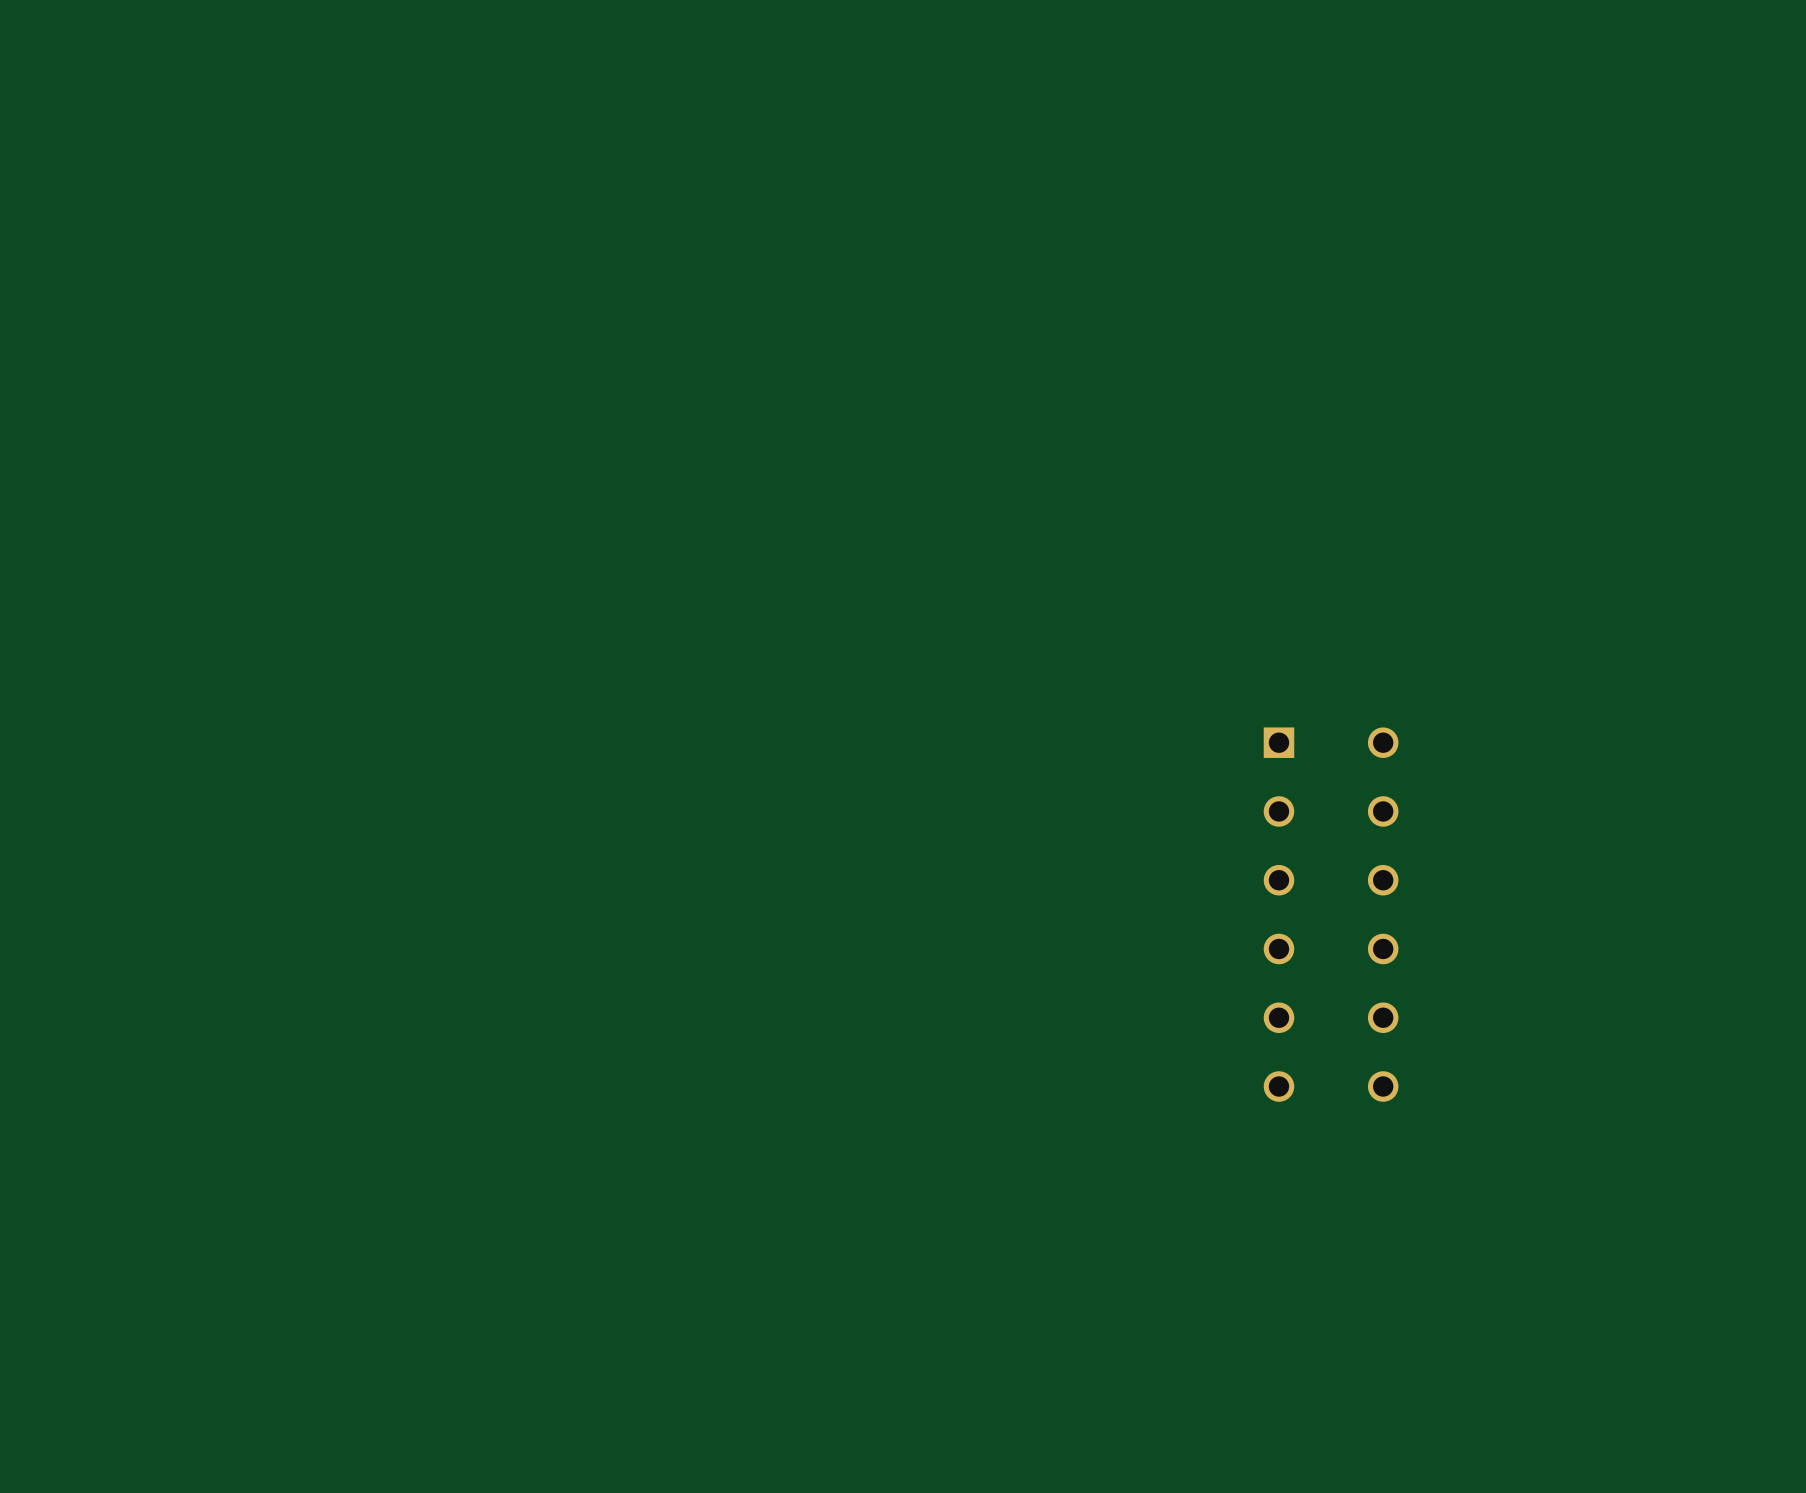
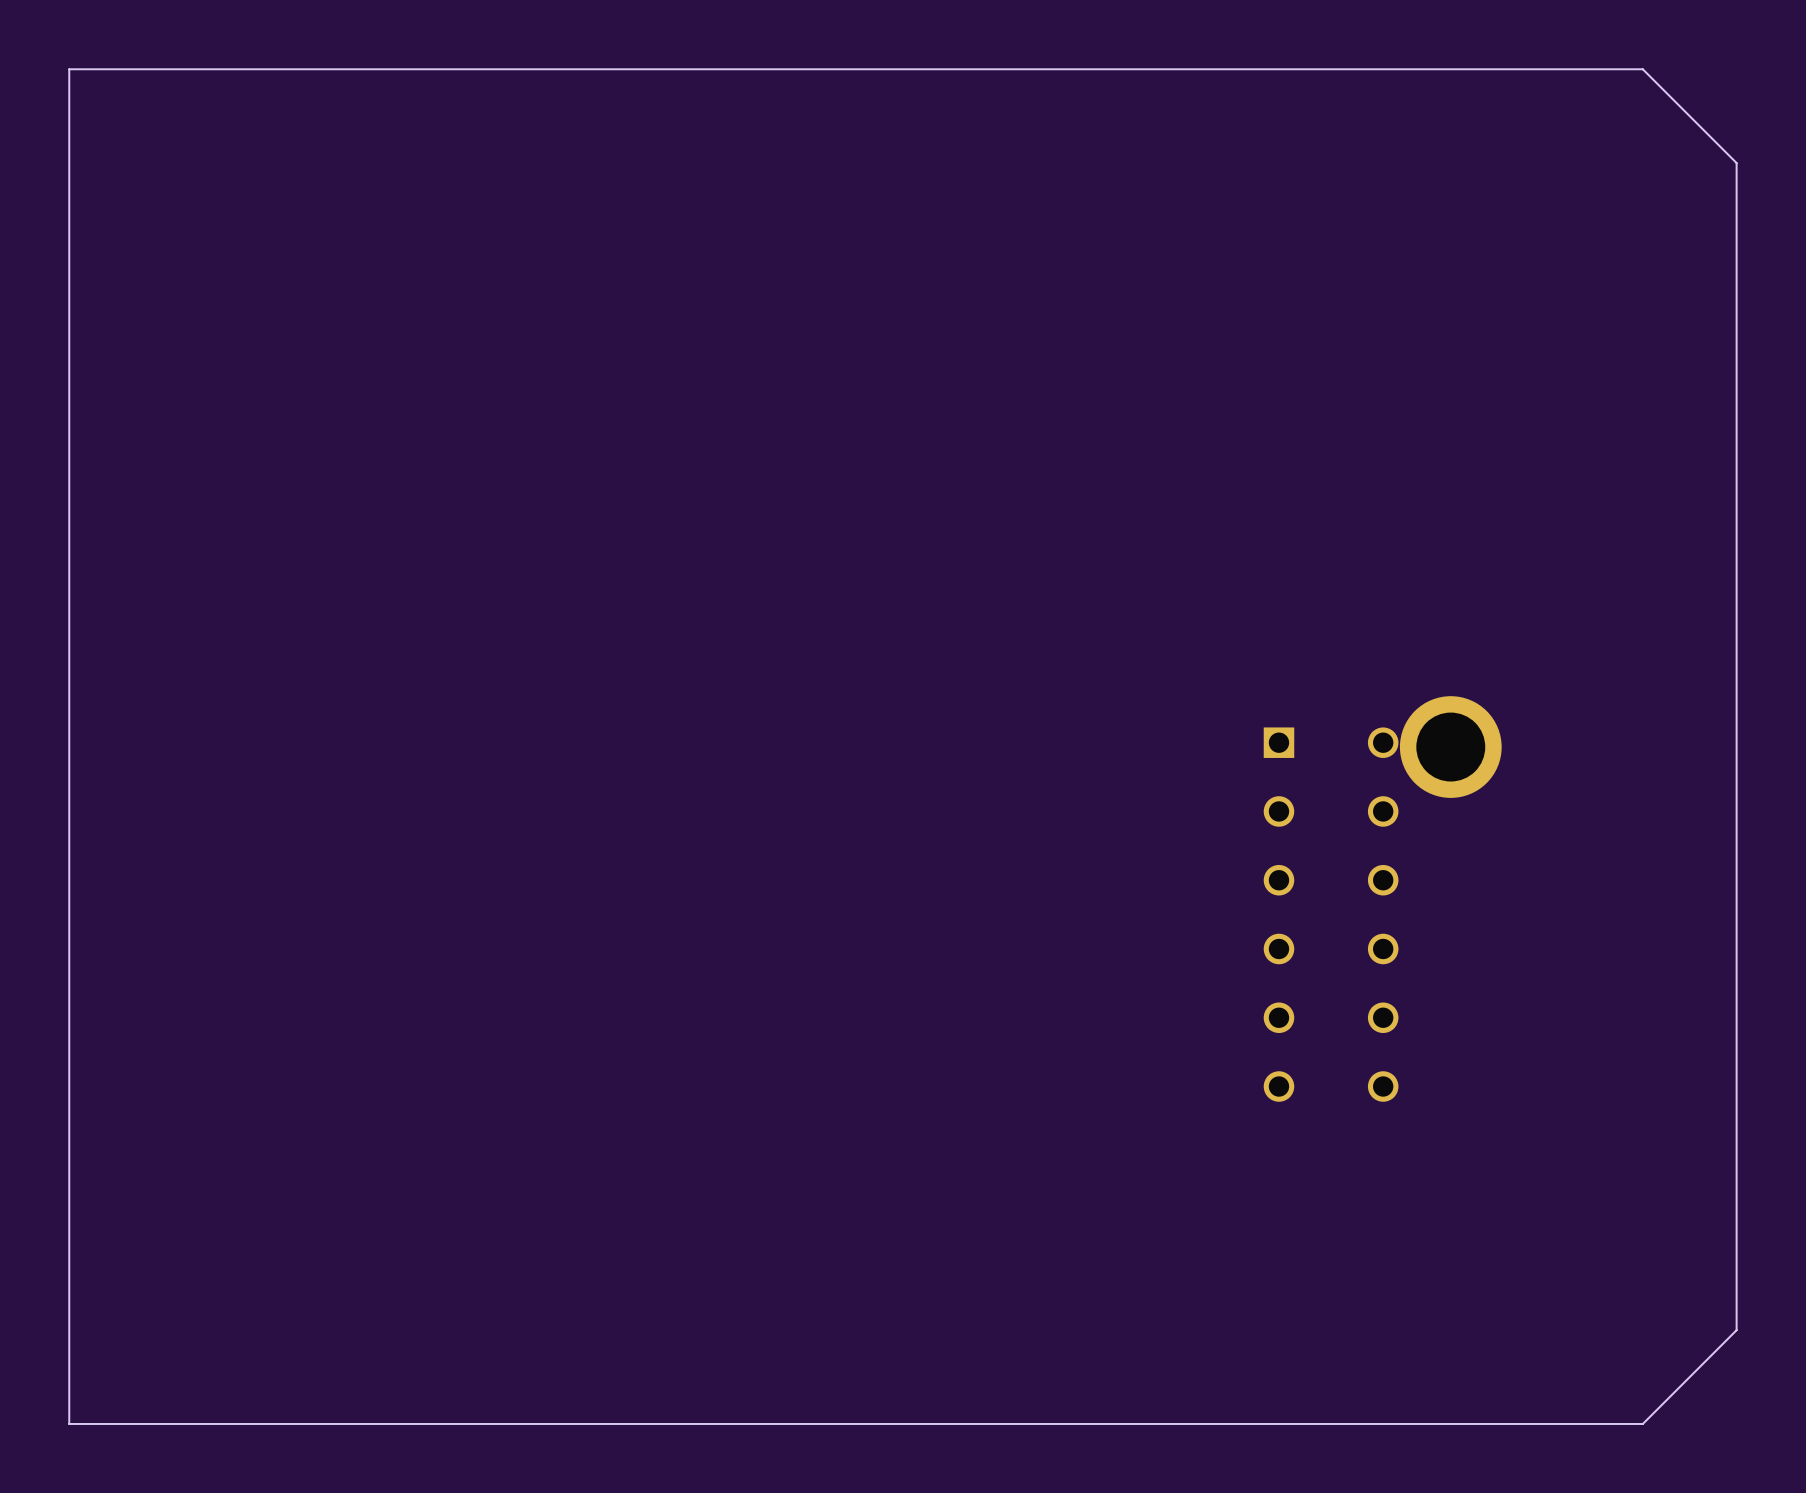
drawing: none -> [68, 68, 1738, 1425]
part: none -> (1450, 747)

